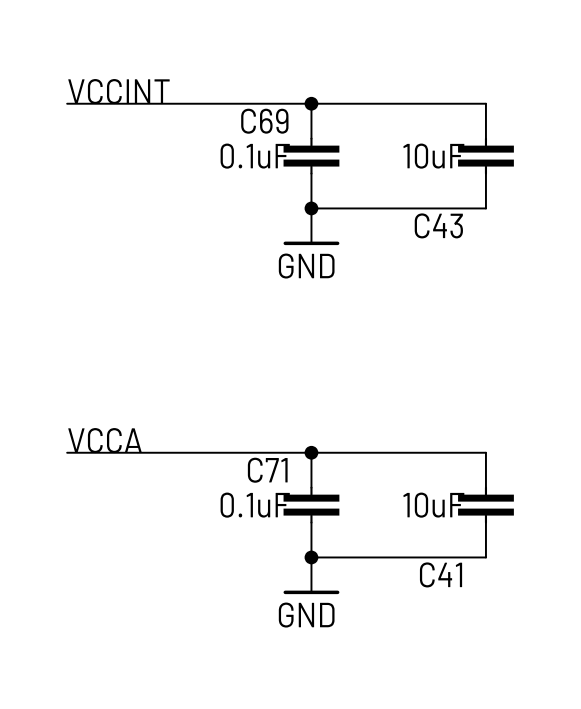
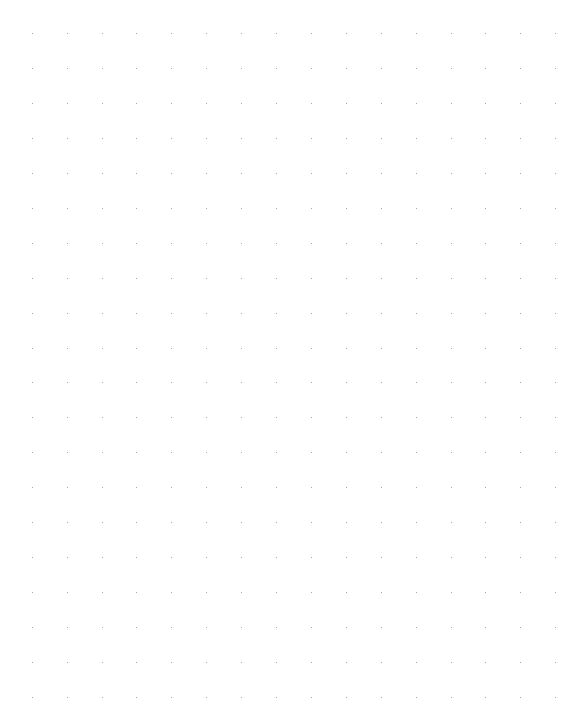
label: VCCINT (118, 91) -> none
wire: (67, 103) (485, 103) -> none
junction: (311, 103) -> none
C69: 0.1uF (311, 156) -> none
C43: 10uF (485, 156) -> none
wire: (311, 208) (485, 208) -> none
junction: (311, 208) -> none
power symbol: GND (311, 226) -> none
label: VCCA (105, 440) -> none
wire: (67, 452) (485, 452) -> none
junction: (311, 452) -> none
C71: 0.1uF (311, 505) -> none
C41: 10uF (485, 505) -> none
wire: (311, 557) (485, 557) -> none
junction: (311, 557) -> none
power symbol: GND (311, 575) -> none

